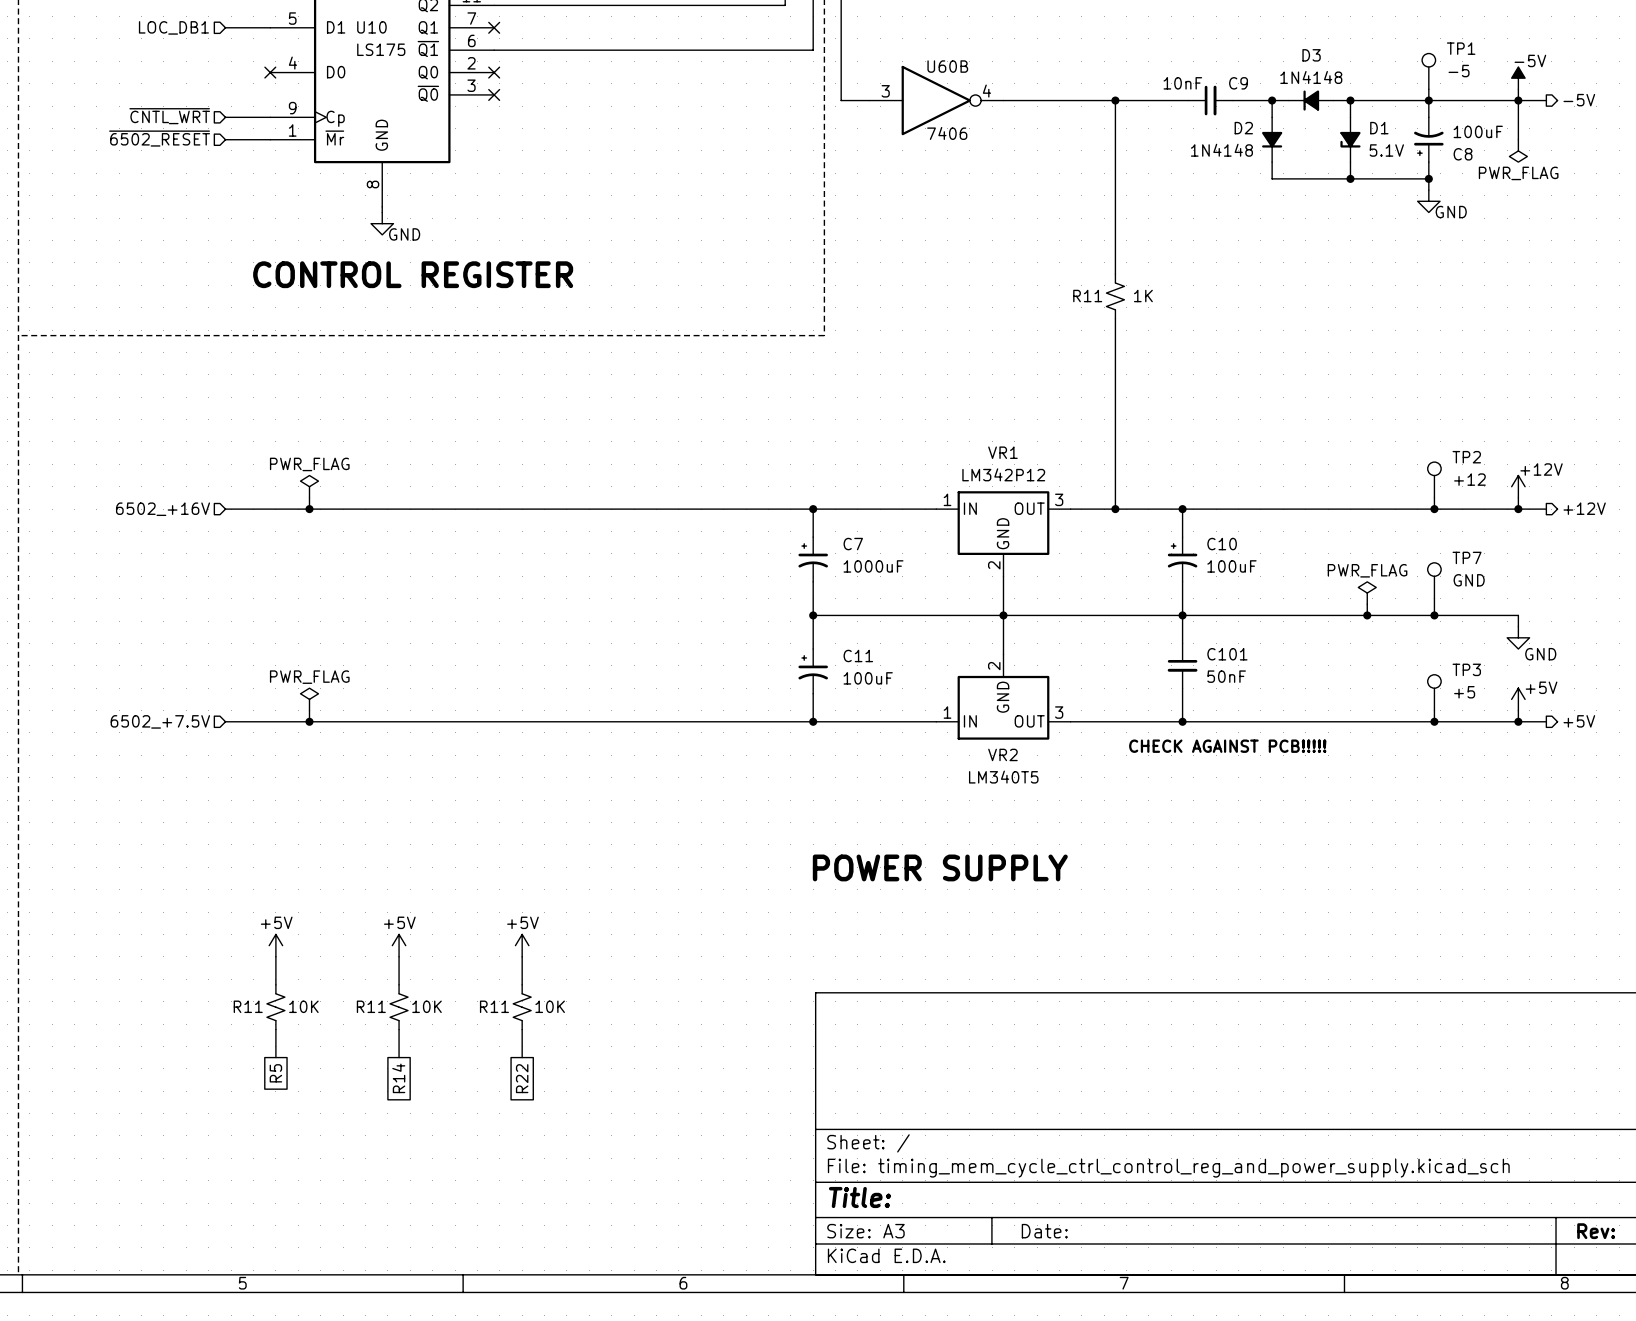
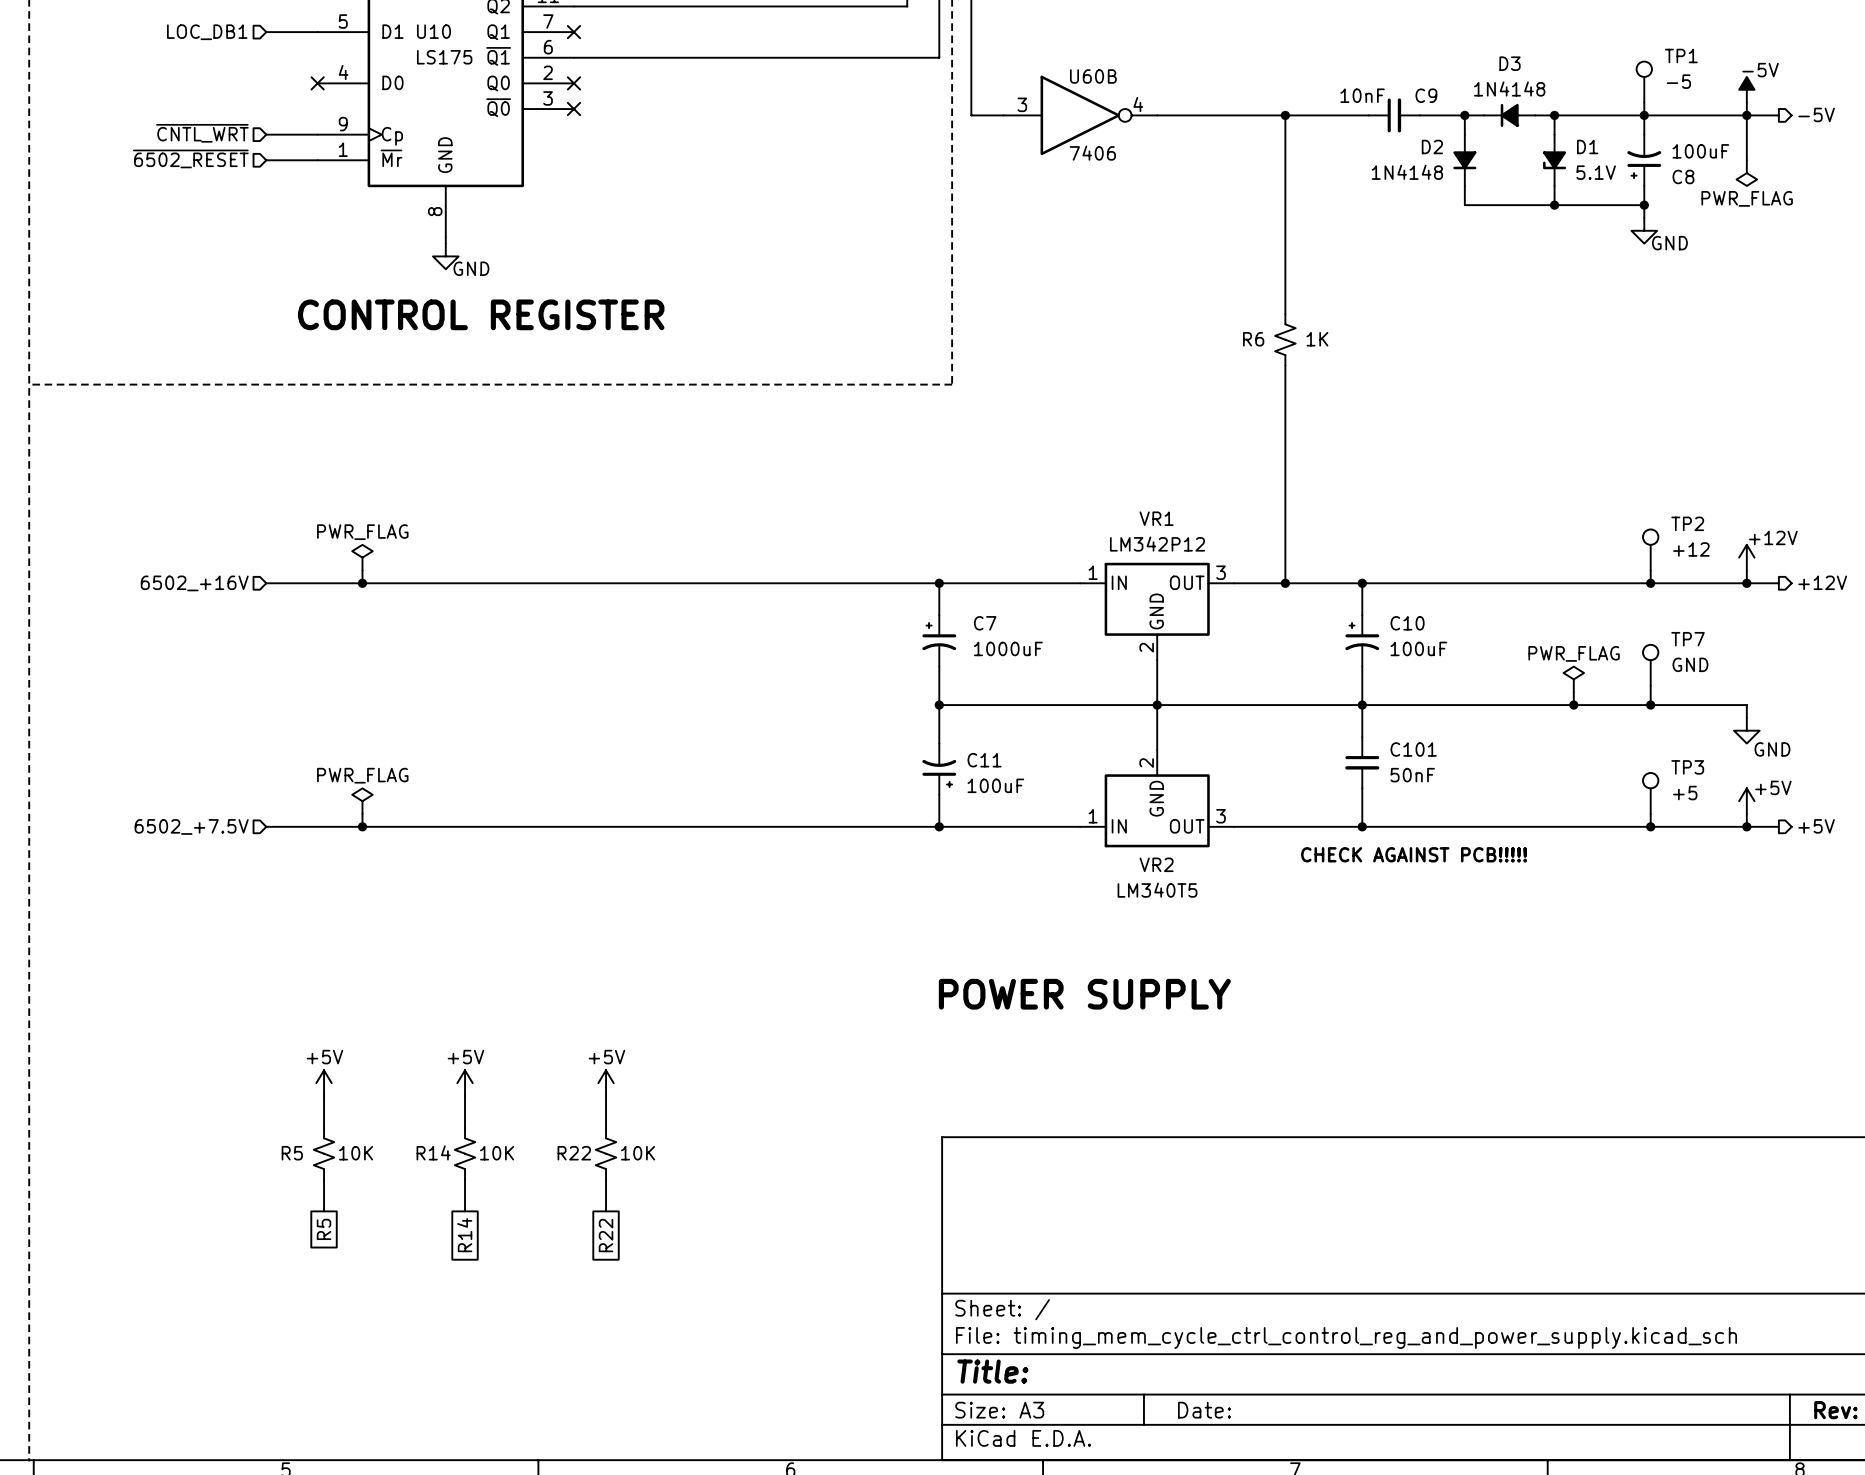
R11 name: R11 (1087, 296) -> R6 (1253, 339)
C11 rotation: 0° (813, 667) -> 180° (939, 773)
R11 name: R11 (248, 1006) -> R5 (292, 1153)
R11 name: R11 (371, 1006) -> R14 (433, 1152)
R11 name: R11 (494, 1006) -> R22 (574, 1153)

